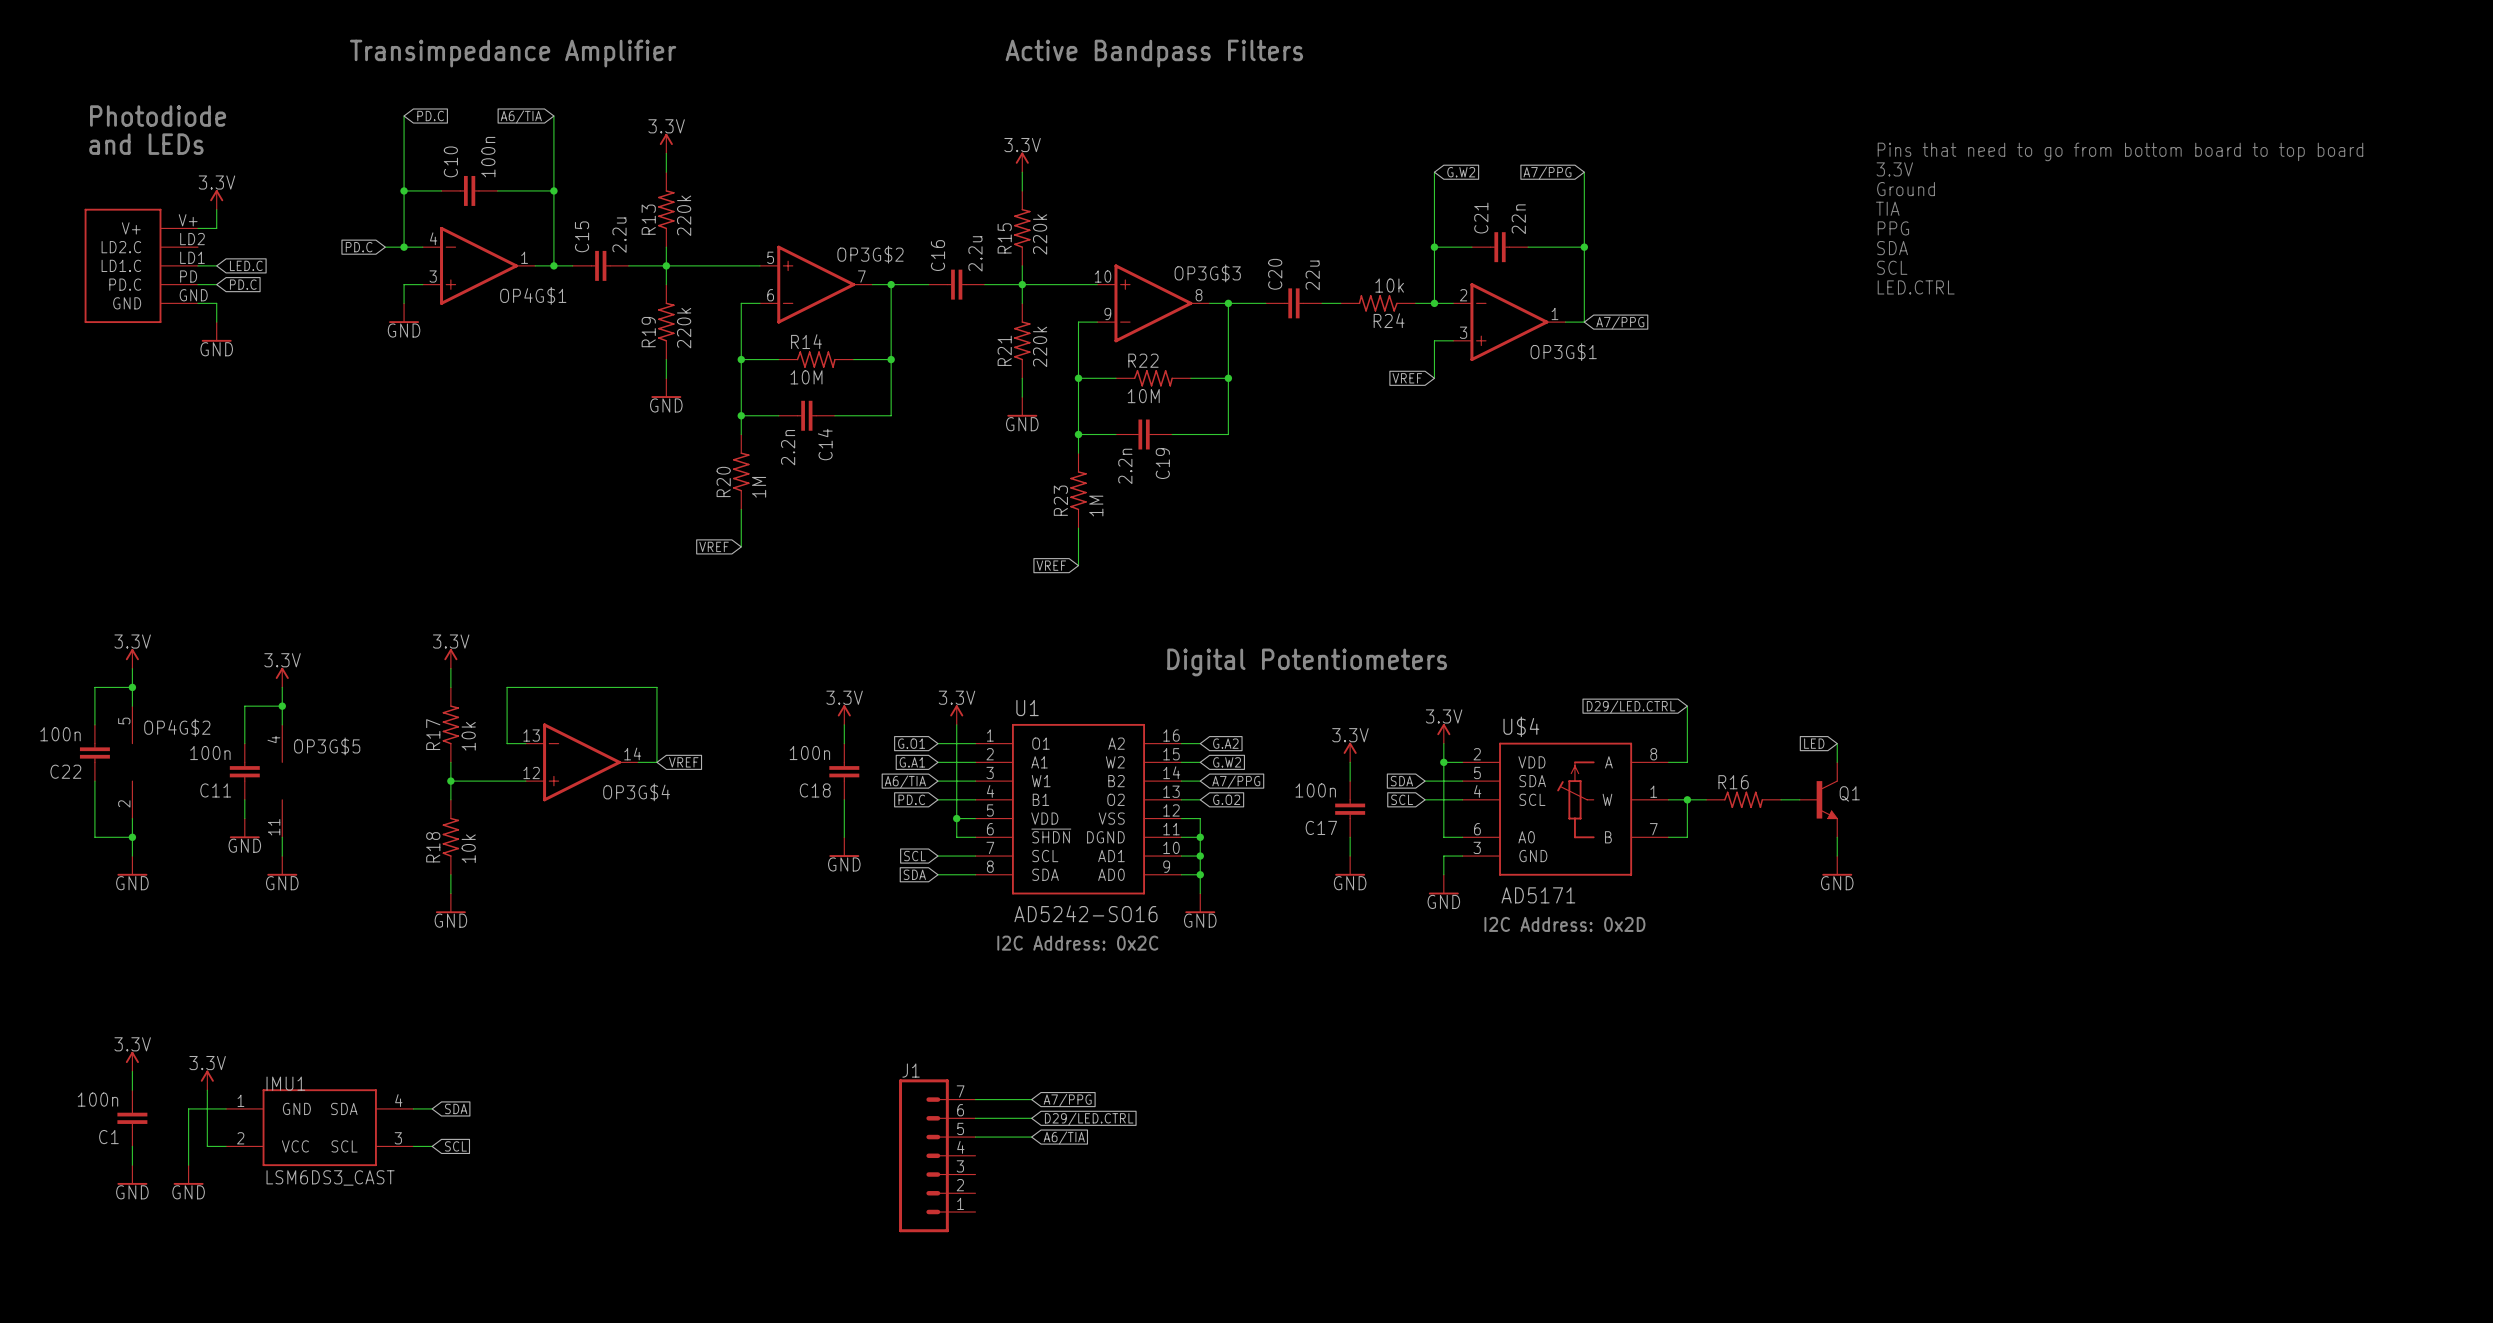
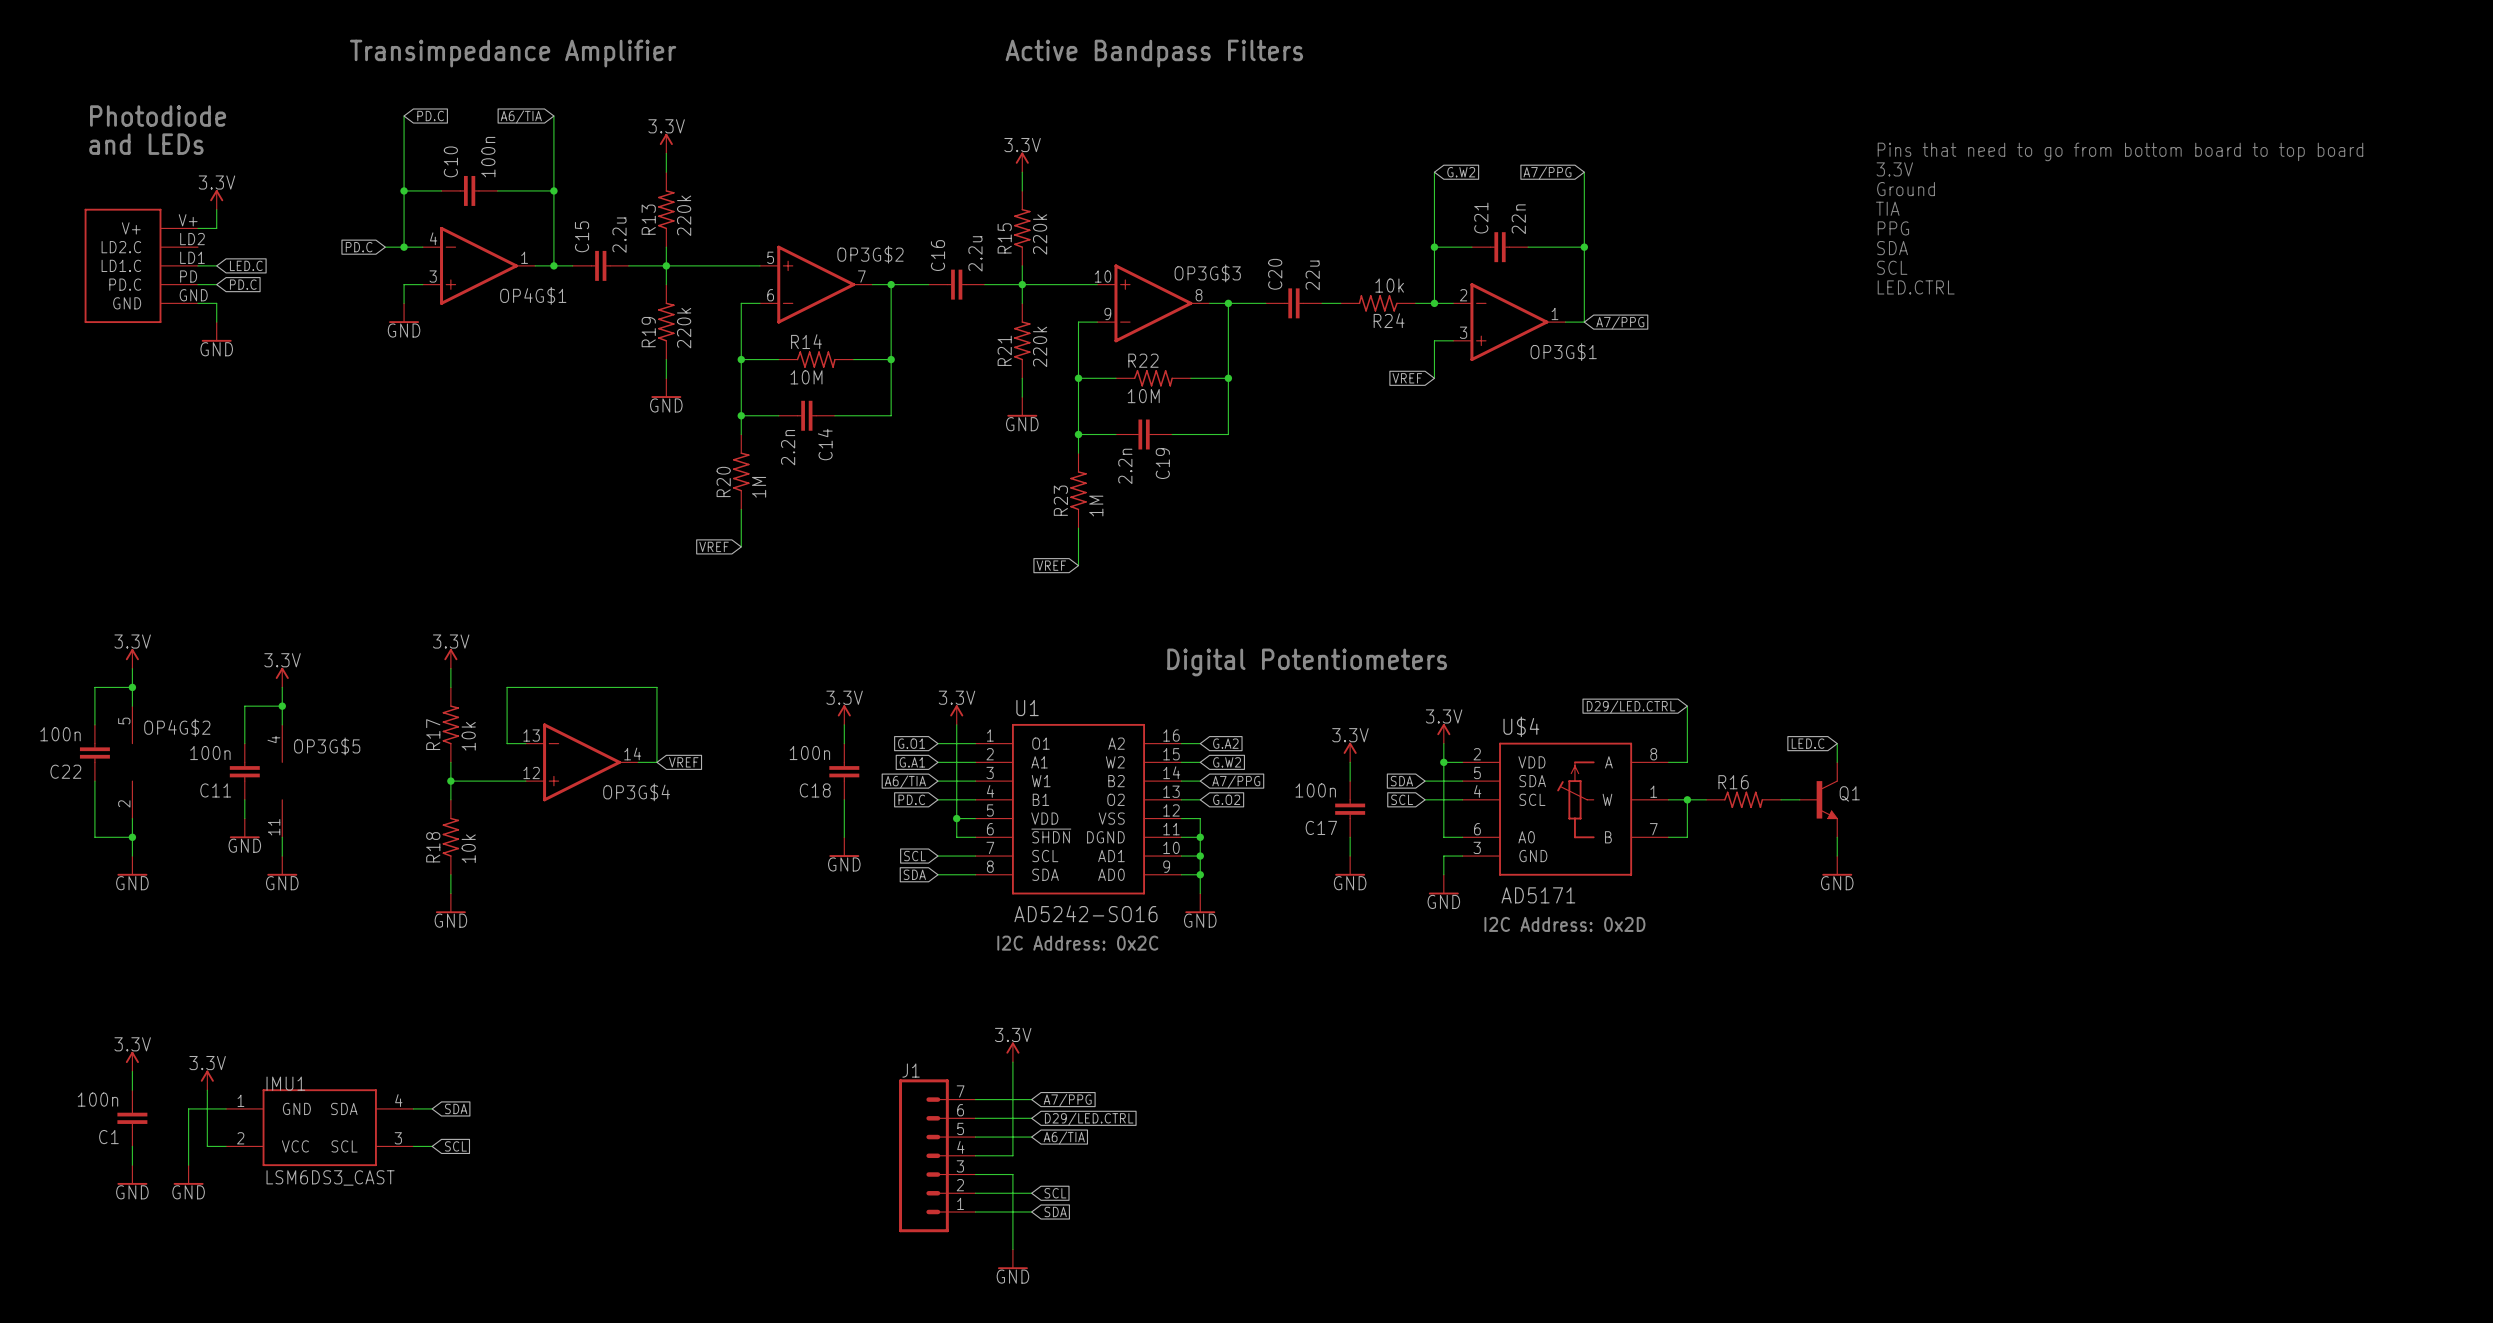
global label: LED (1814, 743) -> LED.C (1808, 743)
power symbol: none -> 3.3V (1012, 1052)
wire: none -> (1012, 1062) (1012, 1155) (975, 1155)
wire: none -> (975, 1174) (1012, 1174) (1012, 1249)
wire: none -> (975, 1193) (1031, 1193)
global label: none -> SCL (1055, 1193)
wire: none -> (975, 1211) (1031, 1211)
global label: none -> SDA (1055, 1211)
power symbol: none -> GND (1012, 1259)

